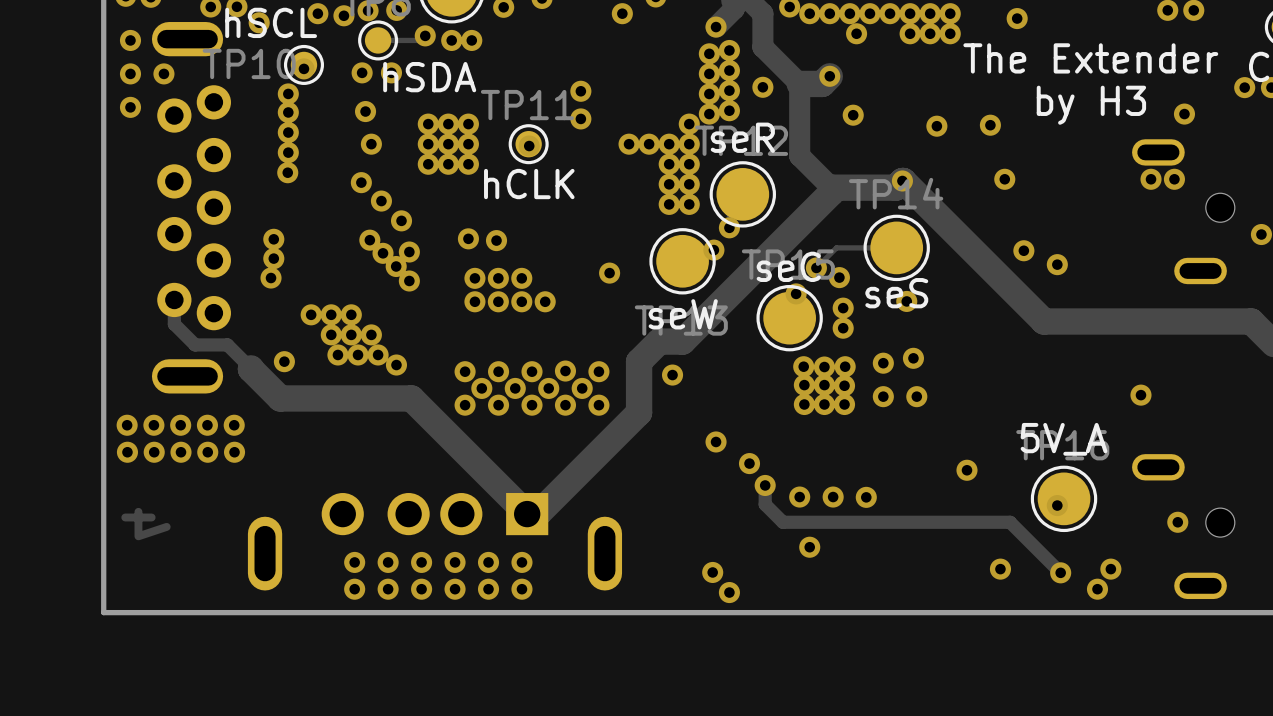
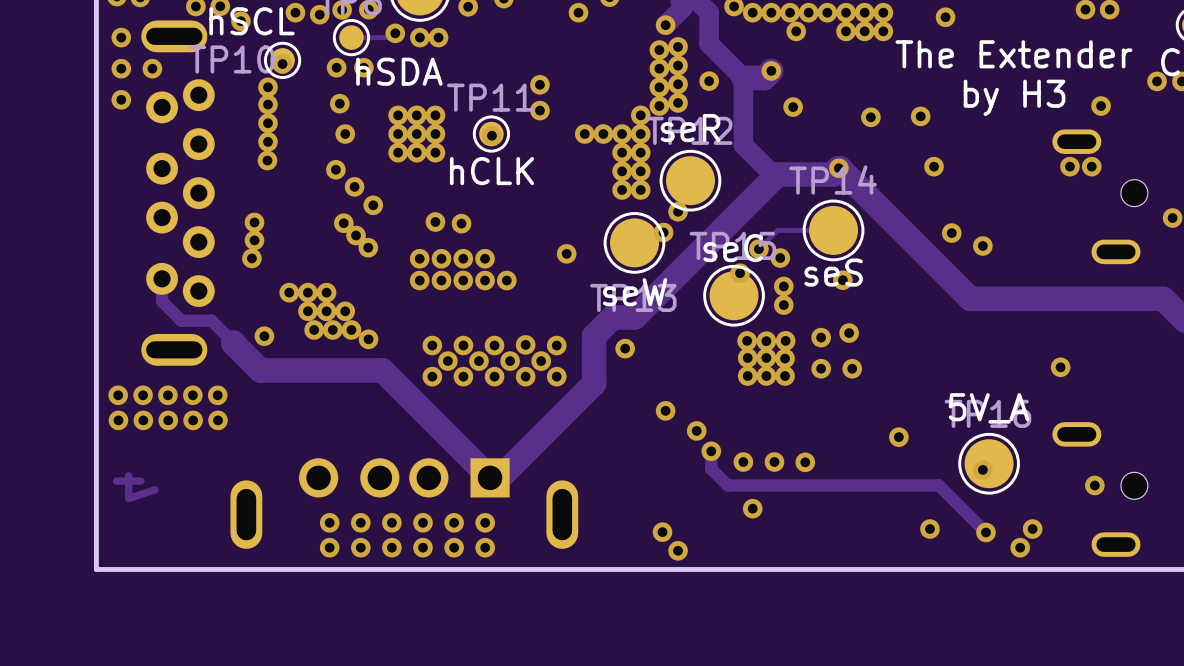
via: (409, 252) -> none
via: none -> (419, 258)
via: (409, 280) -> none
via: none -> (419, 280)

